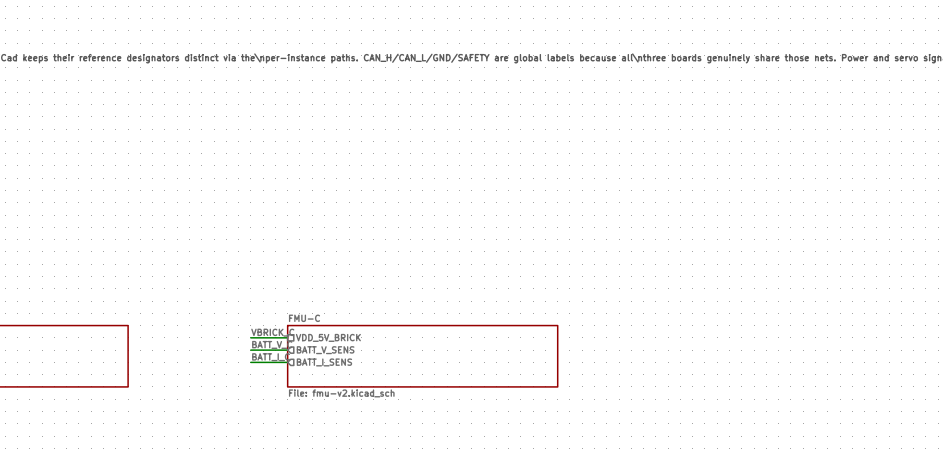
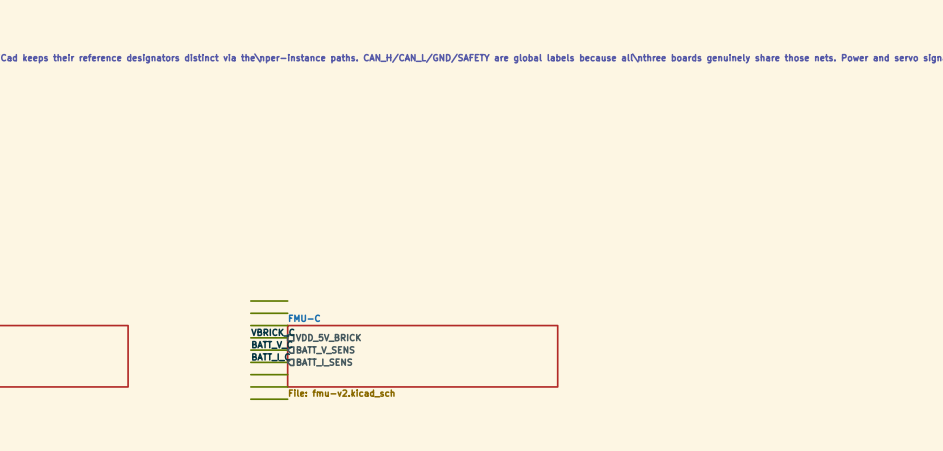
wire: none -> (250, 301) (287, 301)
wire: none -> (250, 313) (287, 313)
wire: none -> (250, 325) (287, 325)
wire: none -> (250, 374) (287, 374)
wire: none -> (250, 386) (287, 386)
wire: none -> (250, 399) (287, 399)

